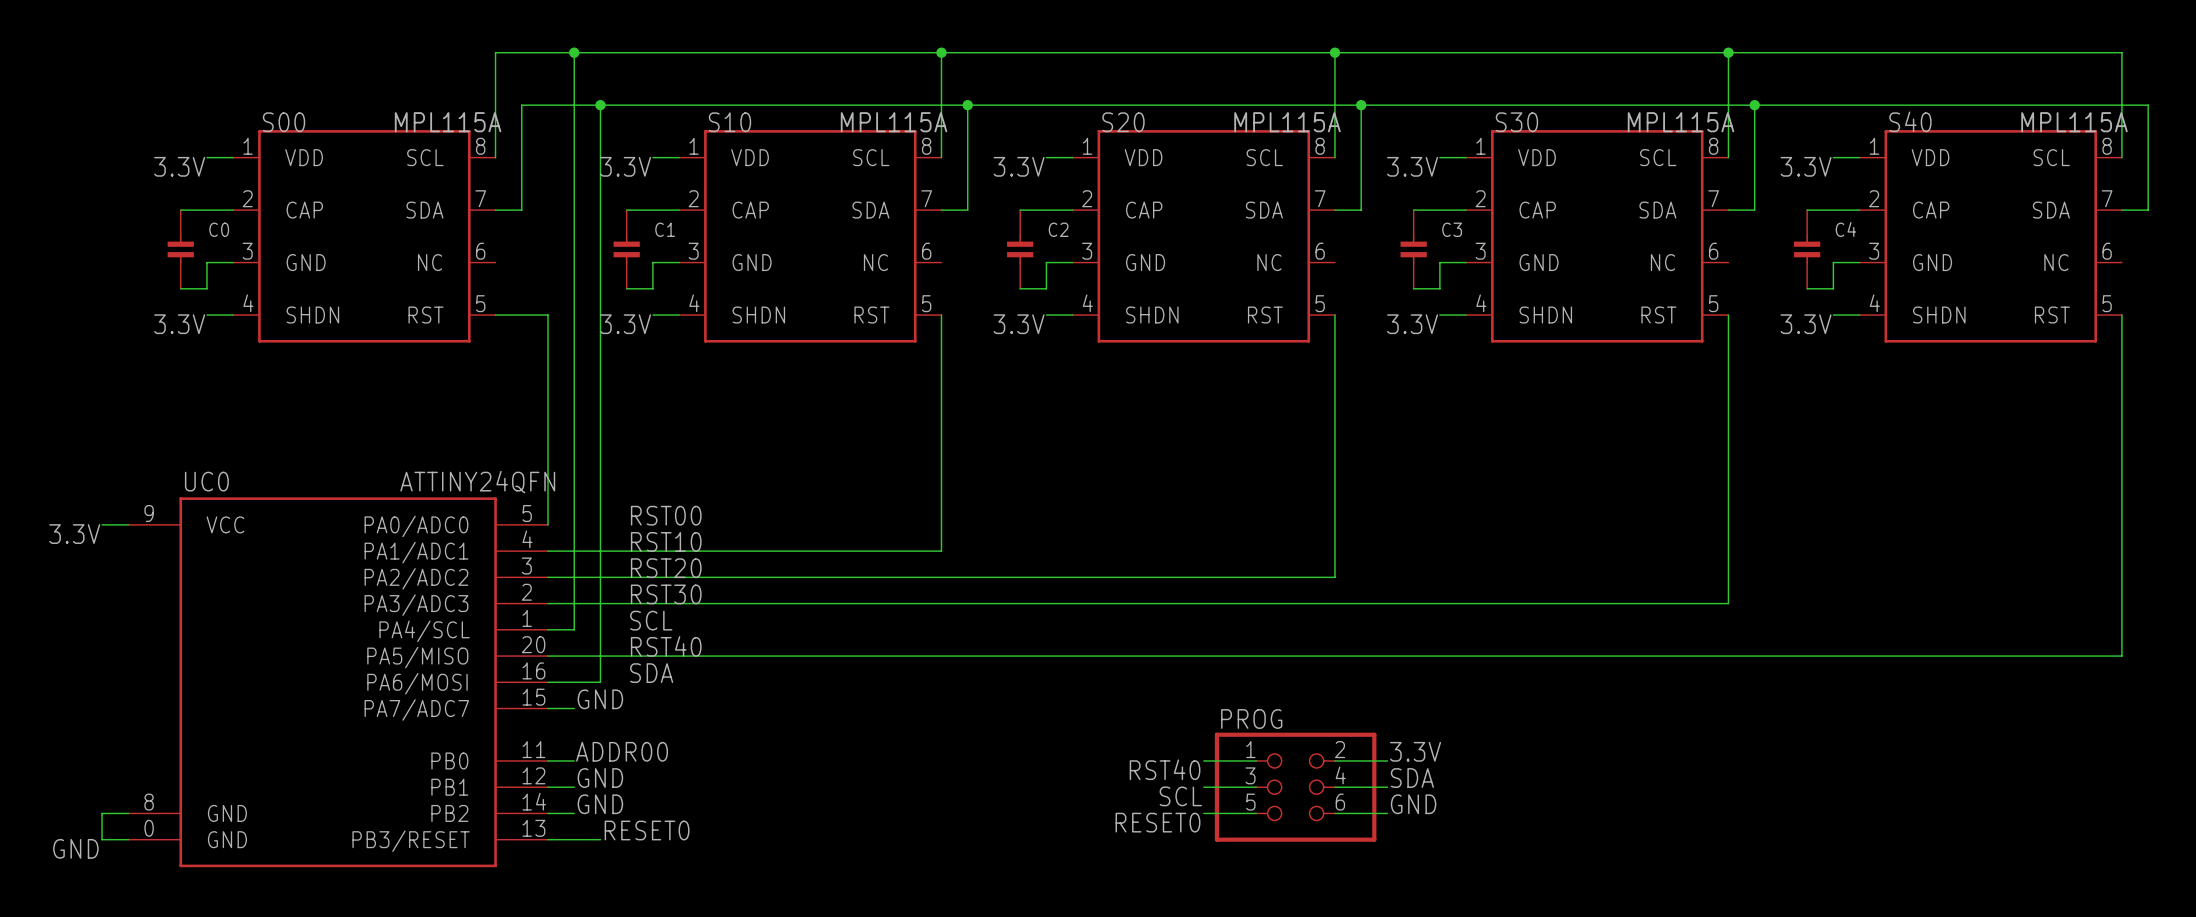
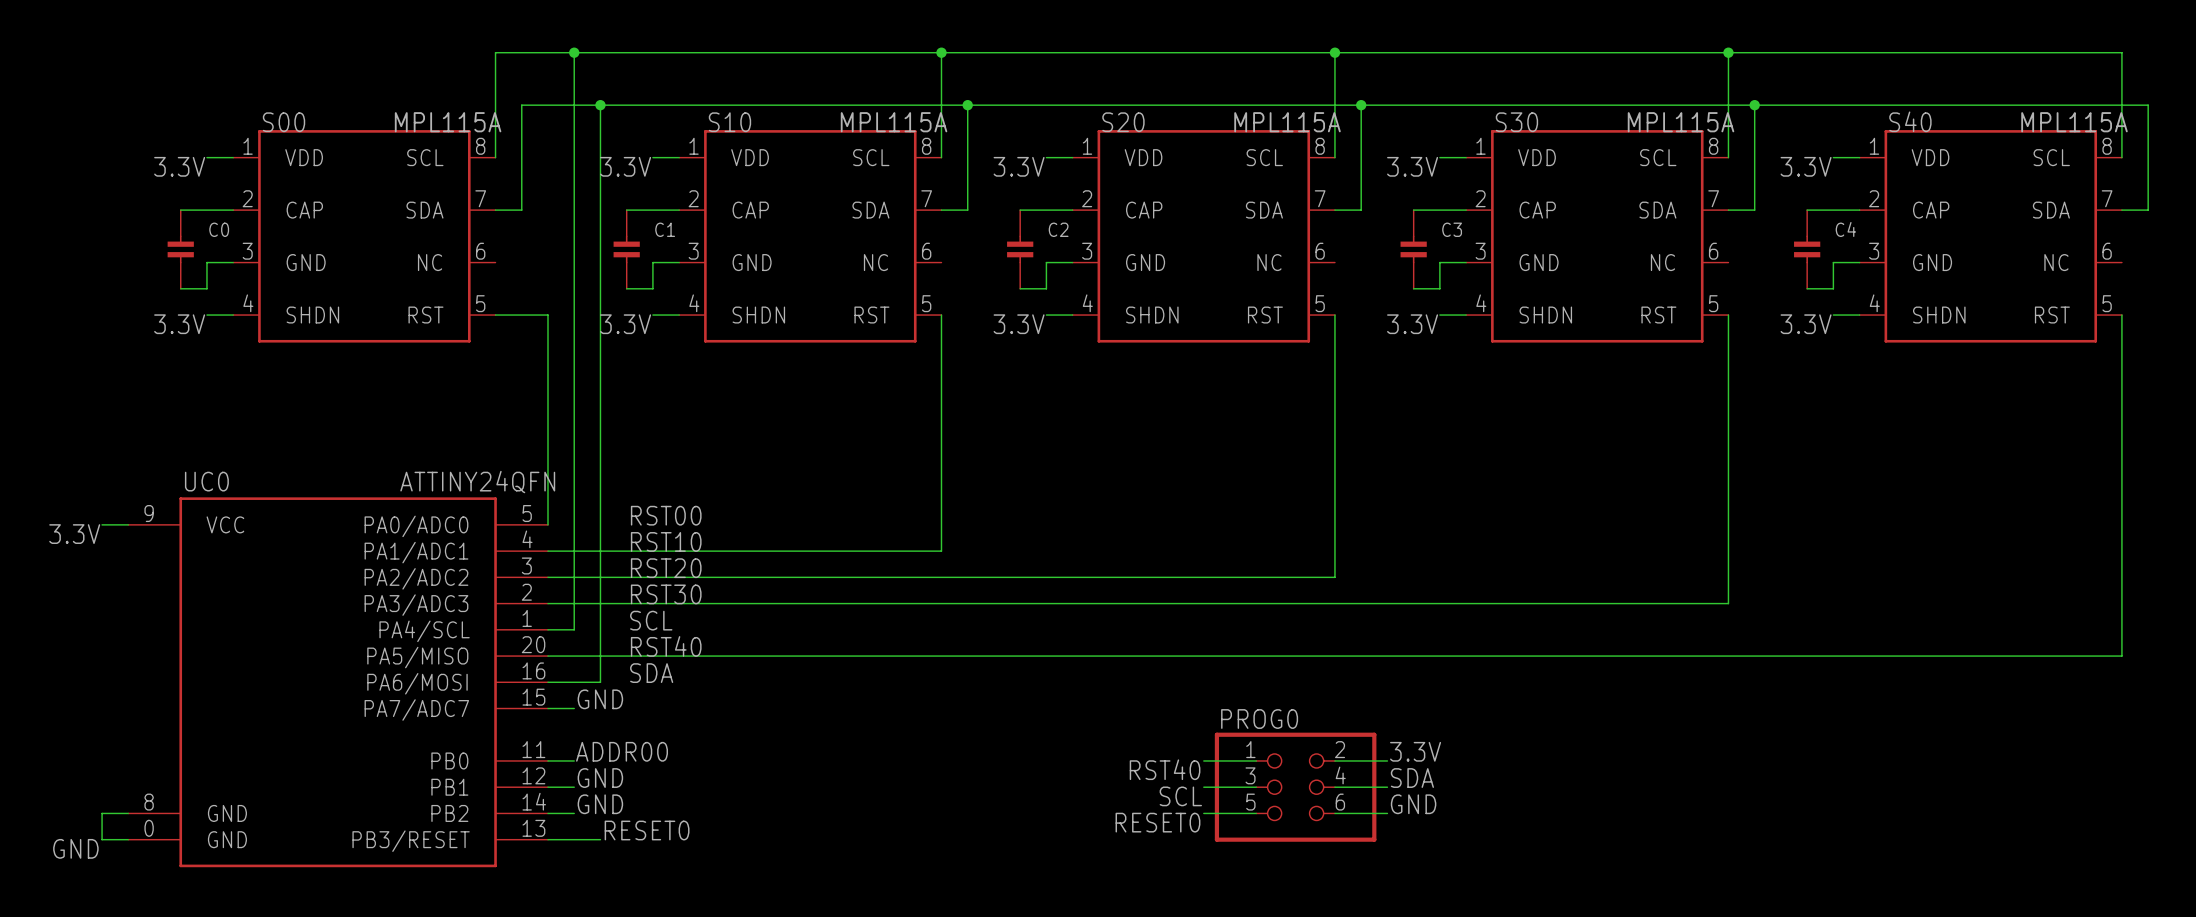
PROG name: PROG (1251, 719) -> PROG0 (1259, 719)

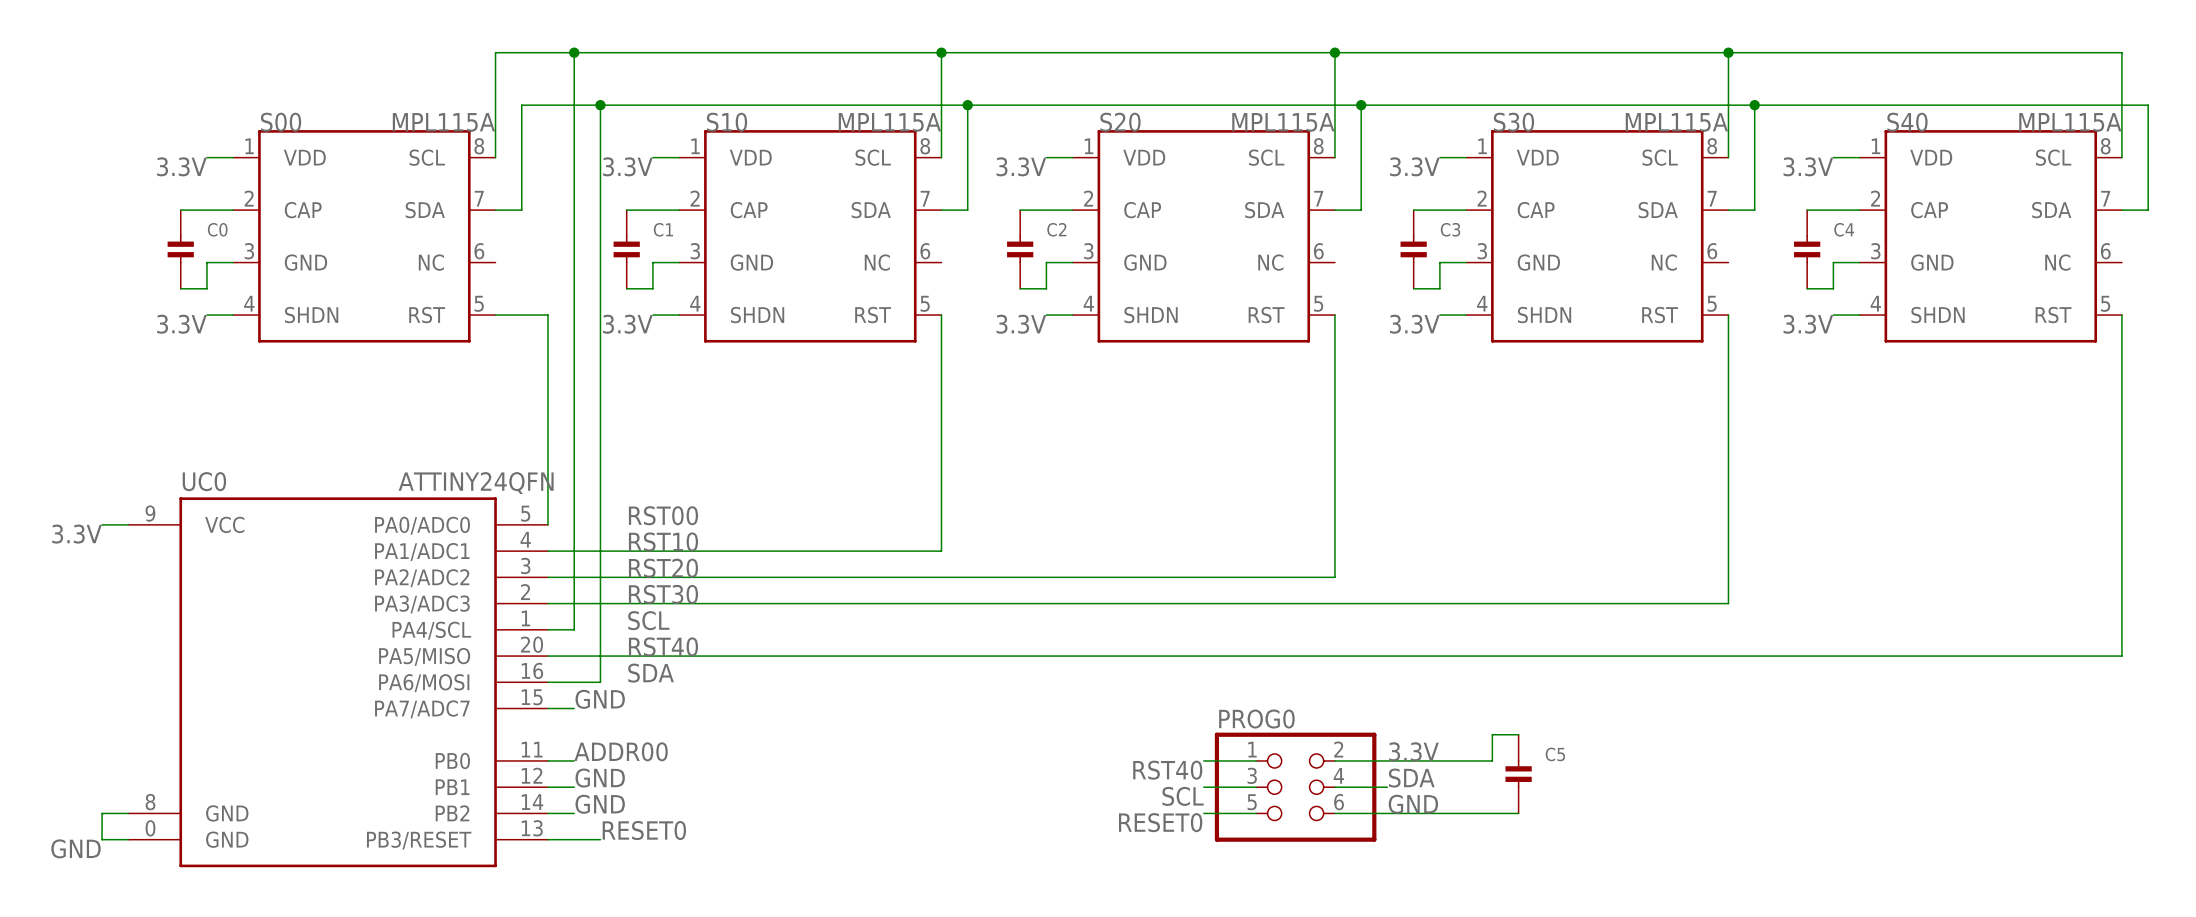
wire: none -> (1518, 734) (1492, 734) (1492, 760) (1387, 760)
C5: none -> (1518, 774)
wire: none -> (1387, 813) (1518, 813)

